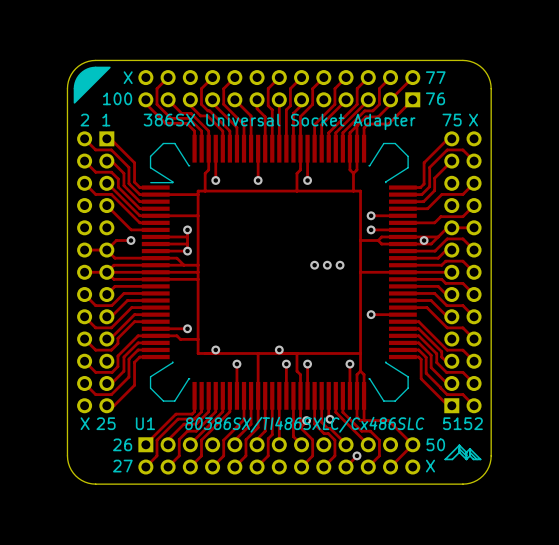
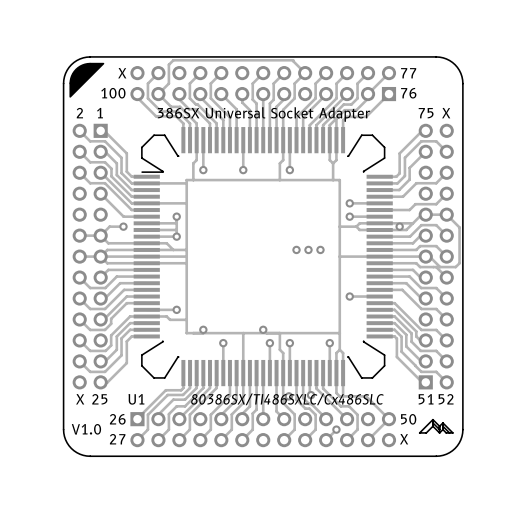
track: none -> (305, 73) (293, 60) (173, 60) (168, 64) (168, 83) (158, 94)
track: none -> (446, 214) (459, 227) (459, 263) (455, 267) (440, 267) (429, 256) (425, 256)
text: none -> V1.0 (86, 429)

